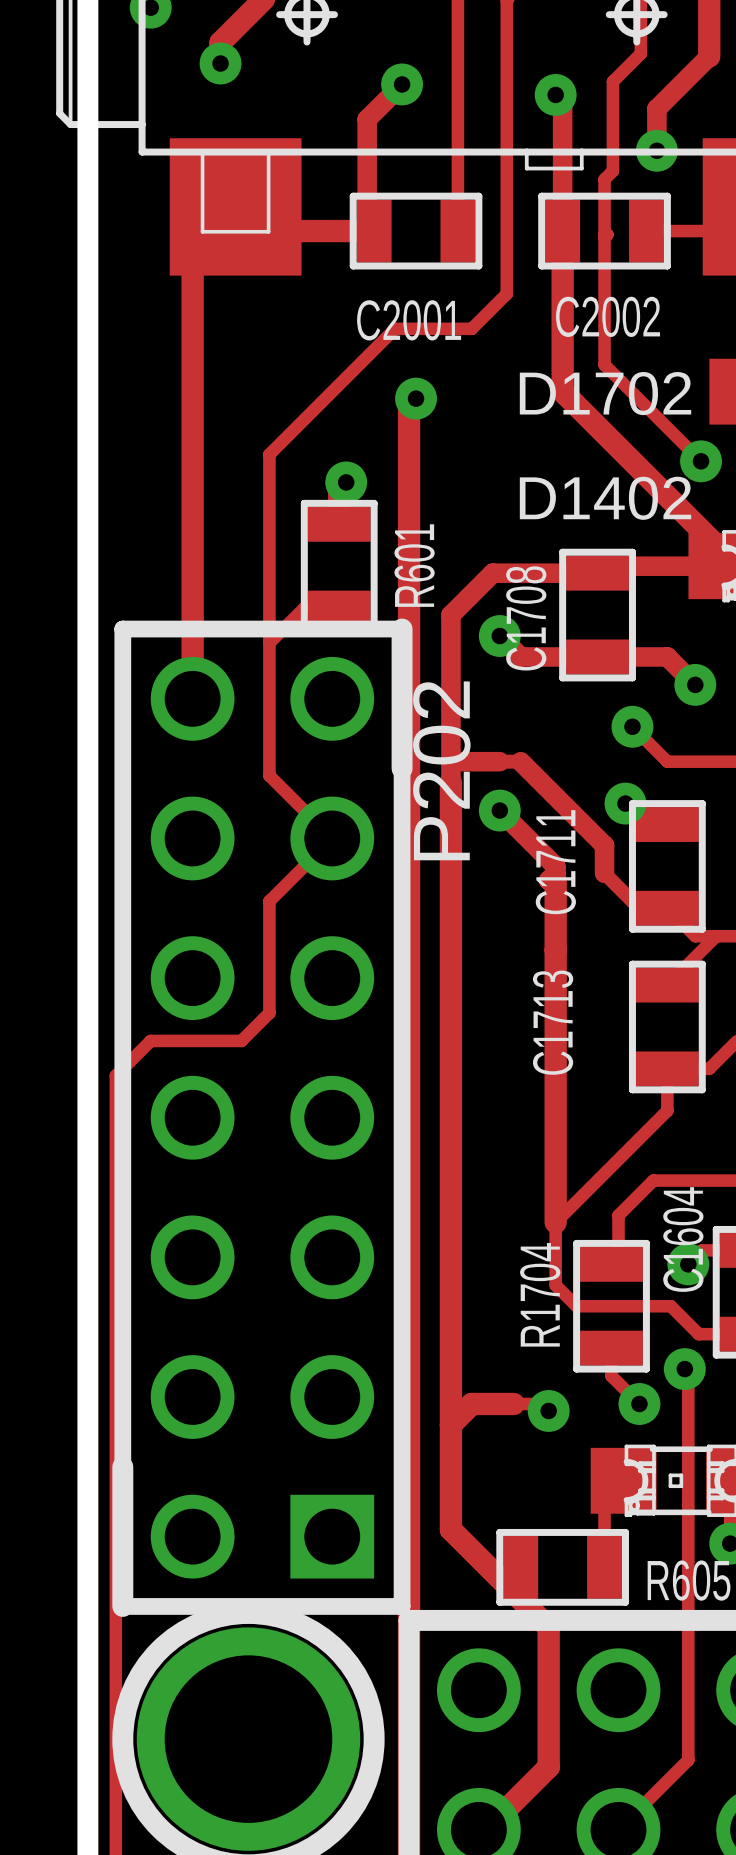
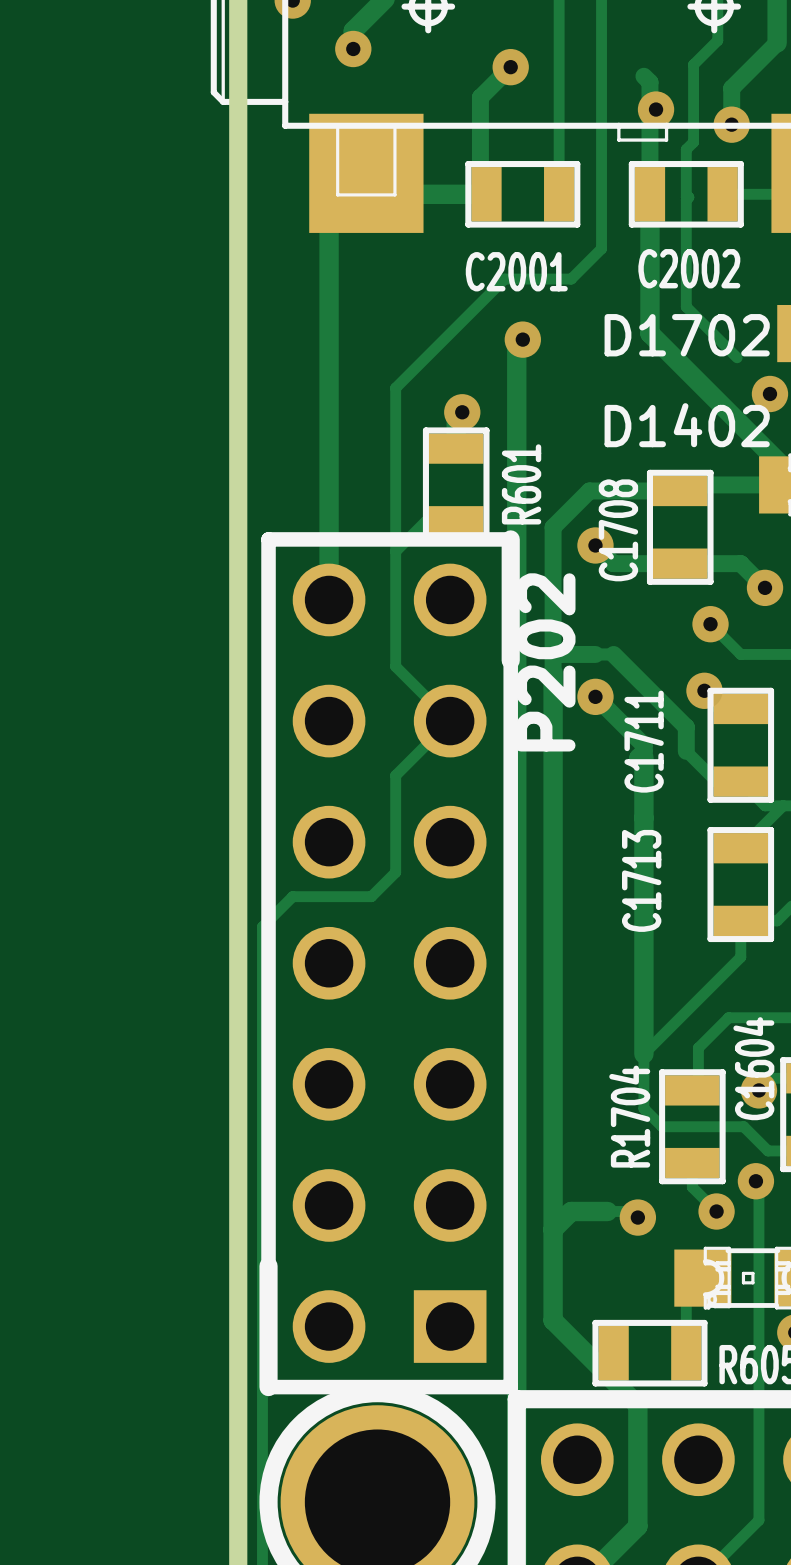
via position: (555, 94) -> (656, 109)
track: (604, 360) (604, 364) (701, 461) -> (686, 306) (737, 357)

